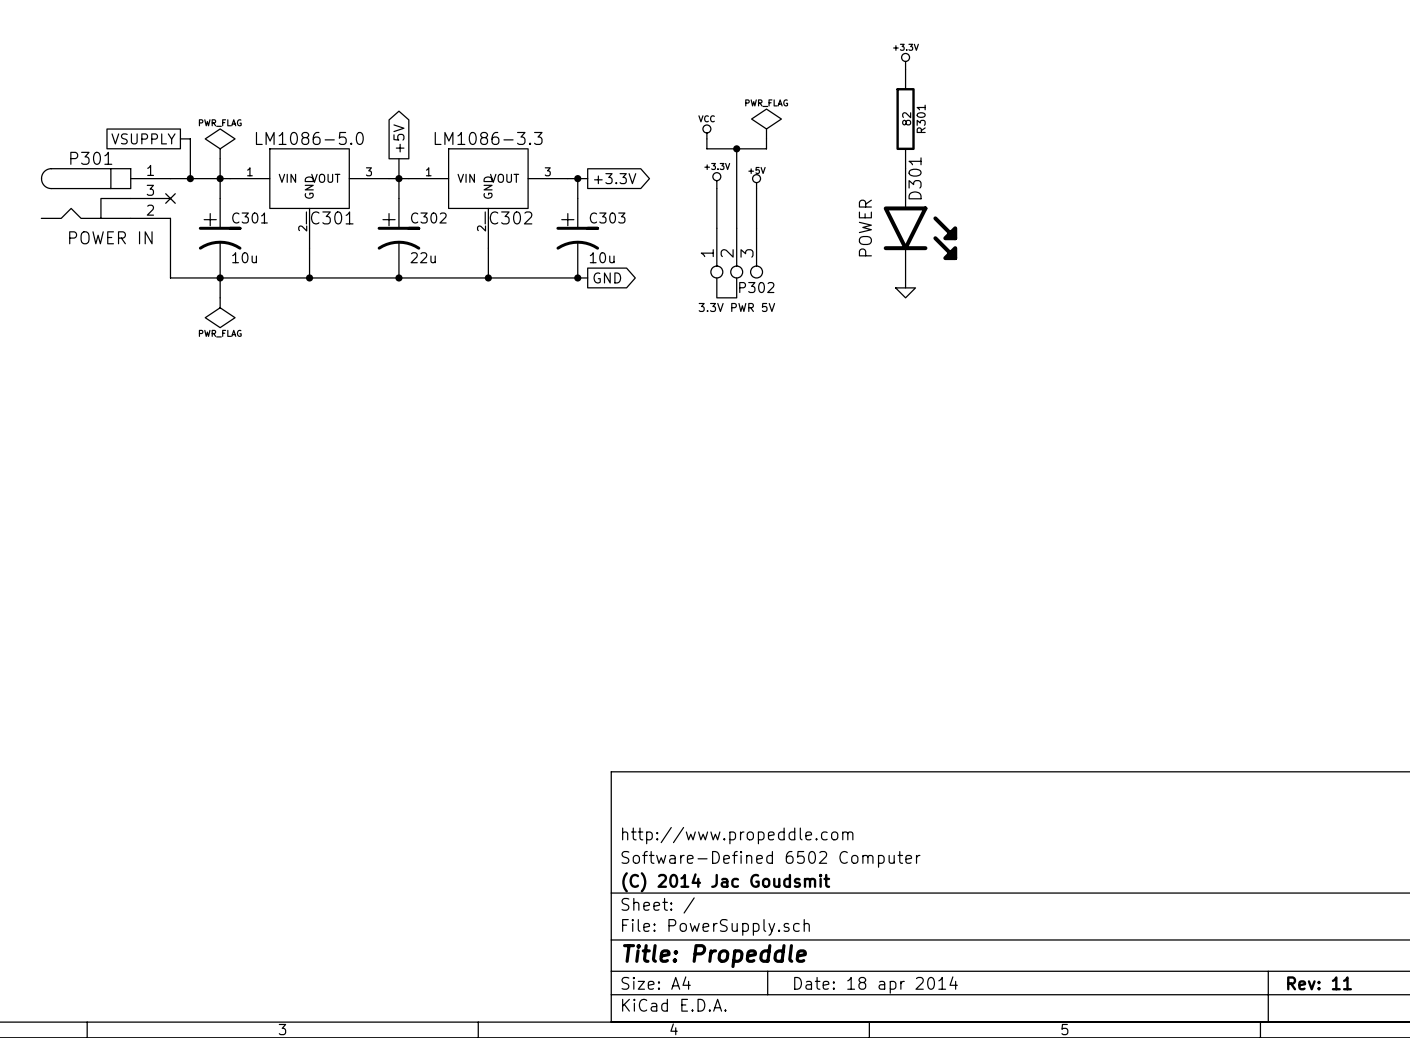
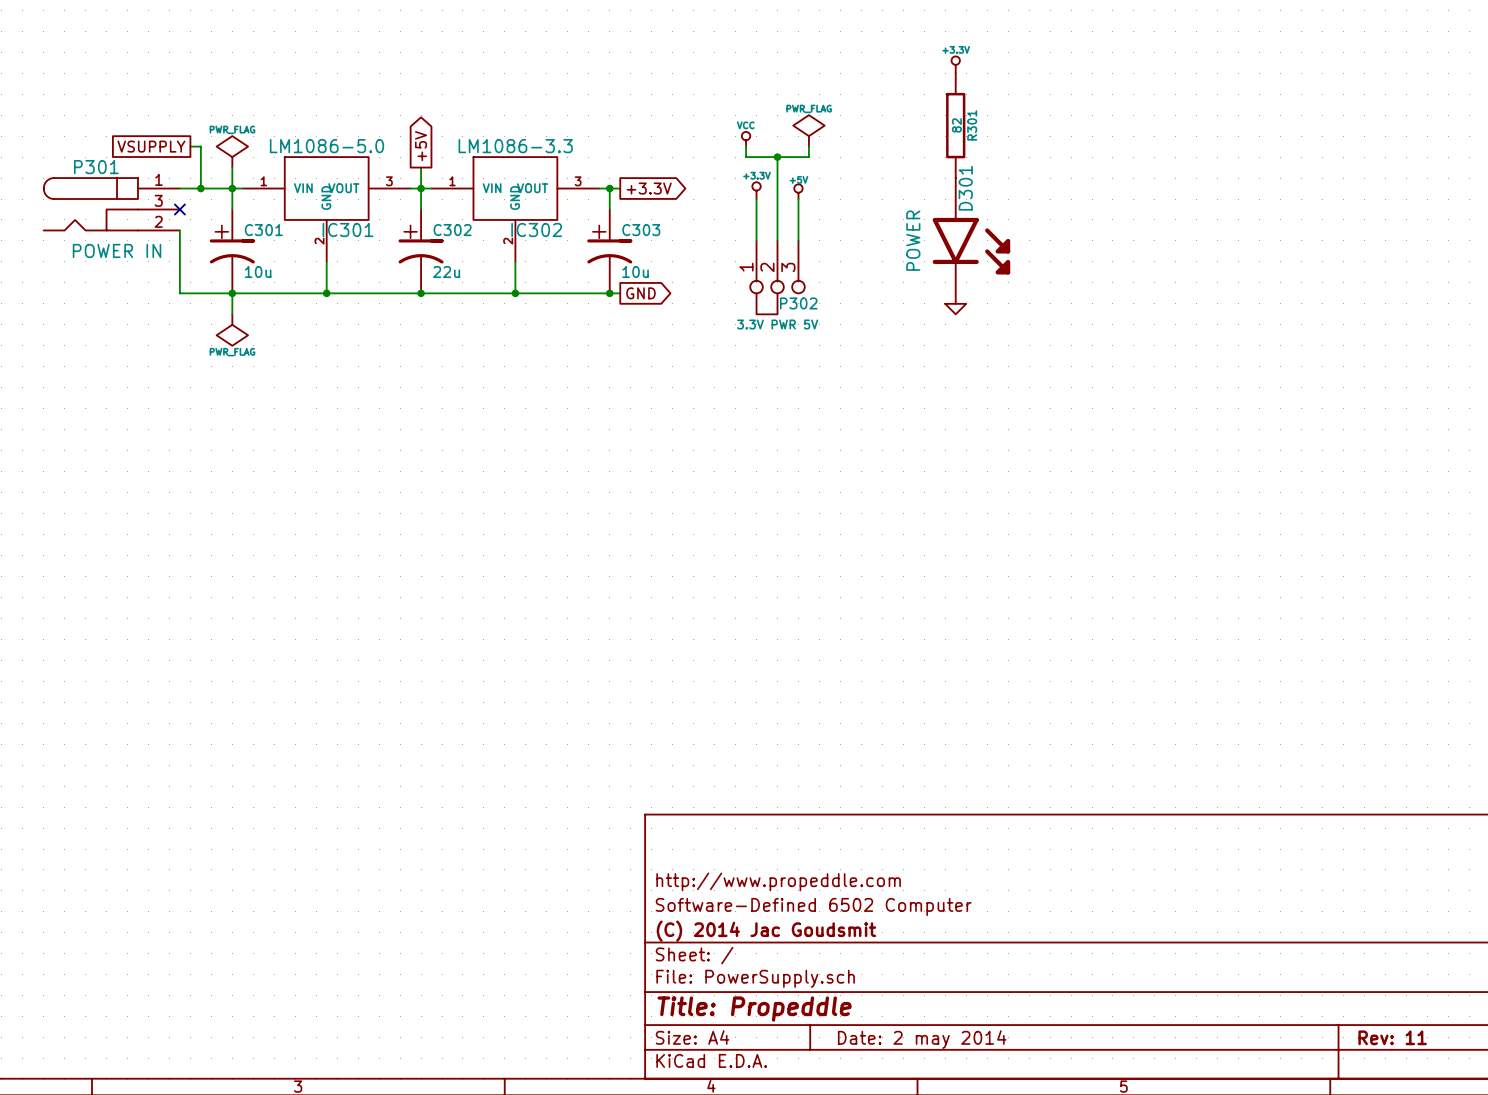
title block: Date: 18 apr 2014 (876, 985) -> Date: 2 may 2014 (922, 1039)

